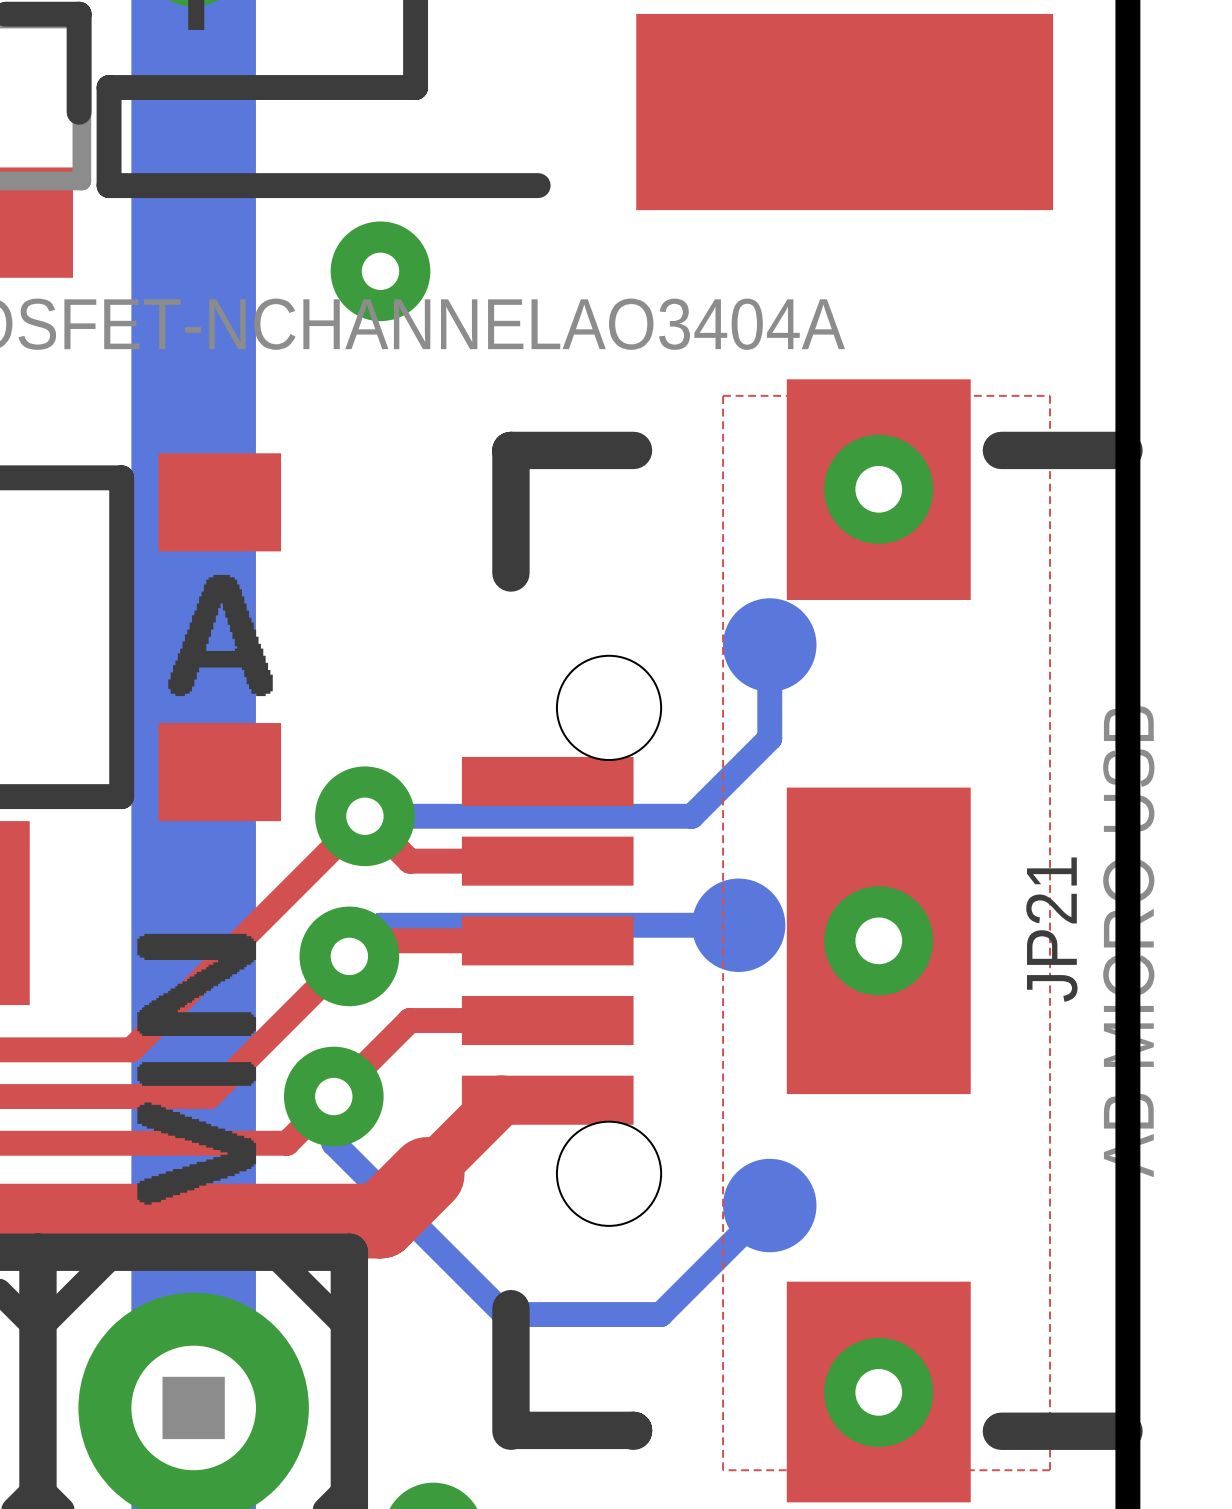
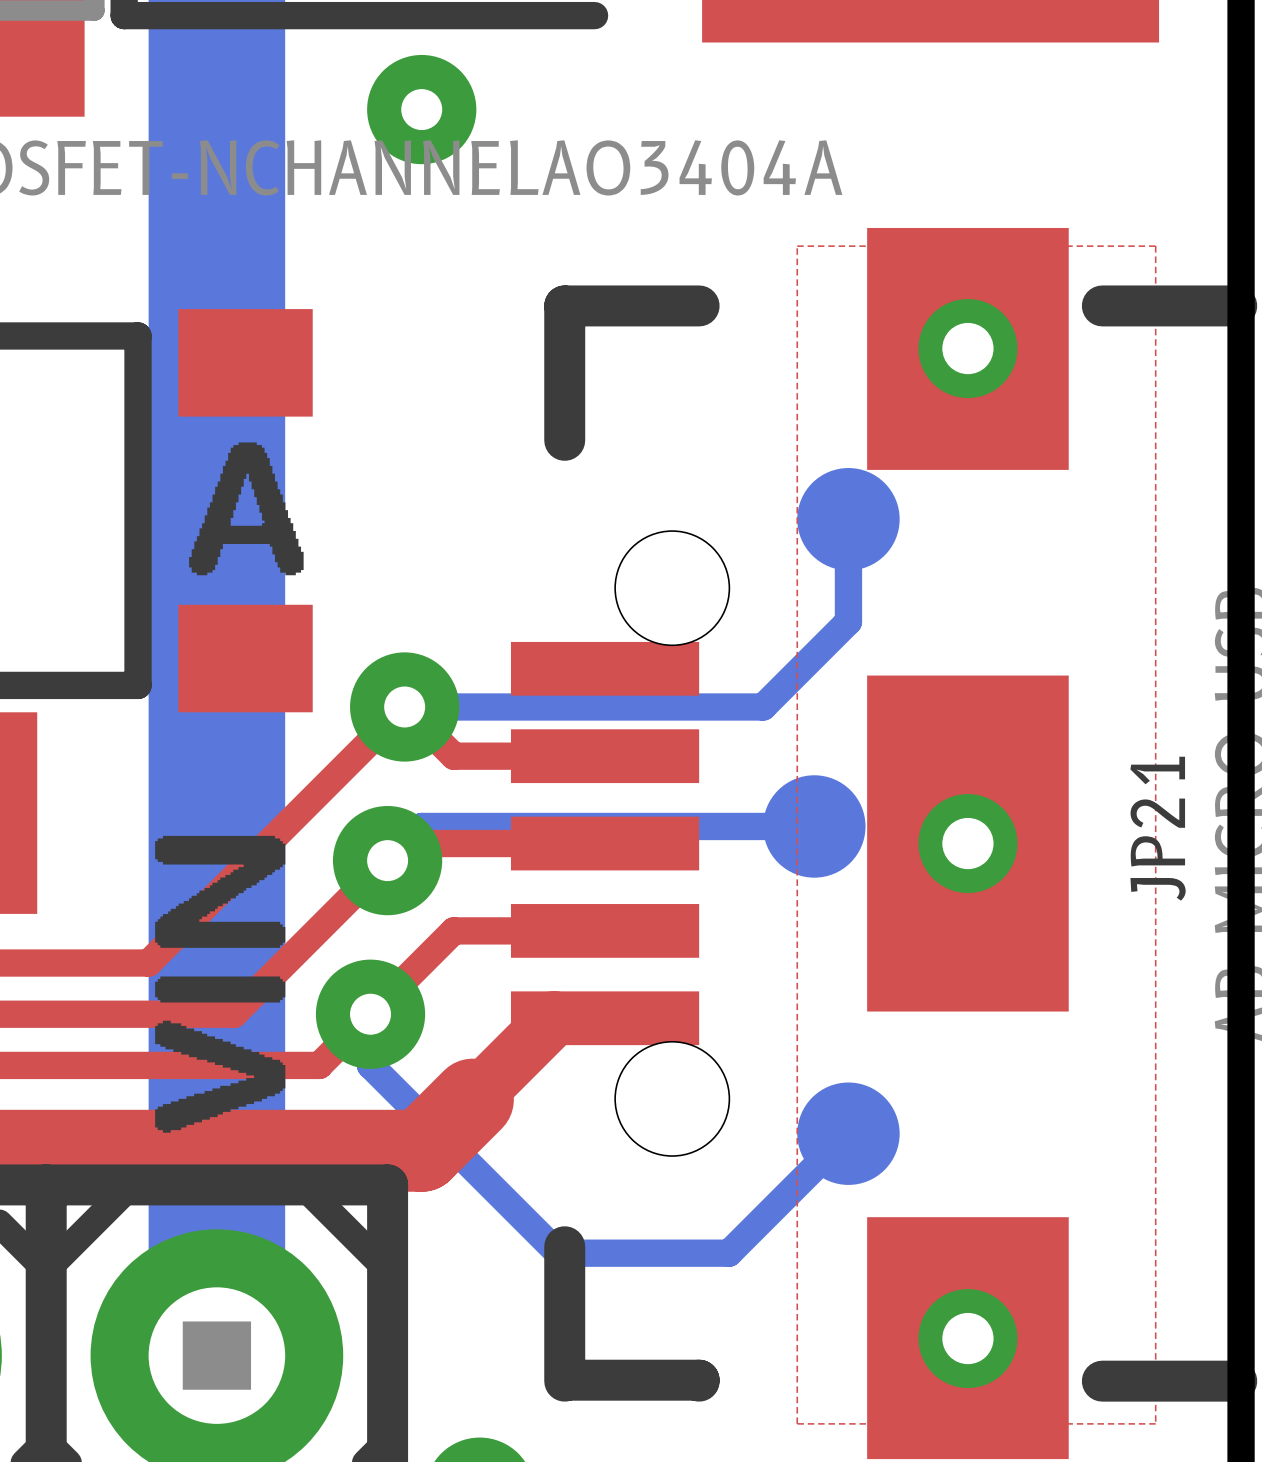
via size: [824, 434, 934, 544] -> [918, 299, 1018, 399]
via size: [824, 886, 934, 996] -> [918, 794, 1018, 894]
via size: [824, 1337, 934, 1447] -> [918, 1289, 1018, 1389]

